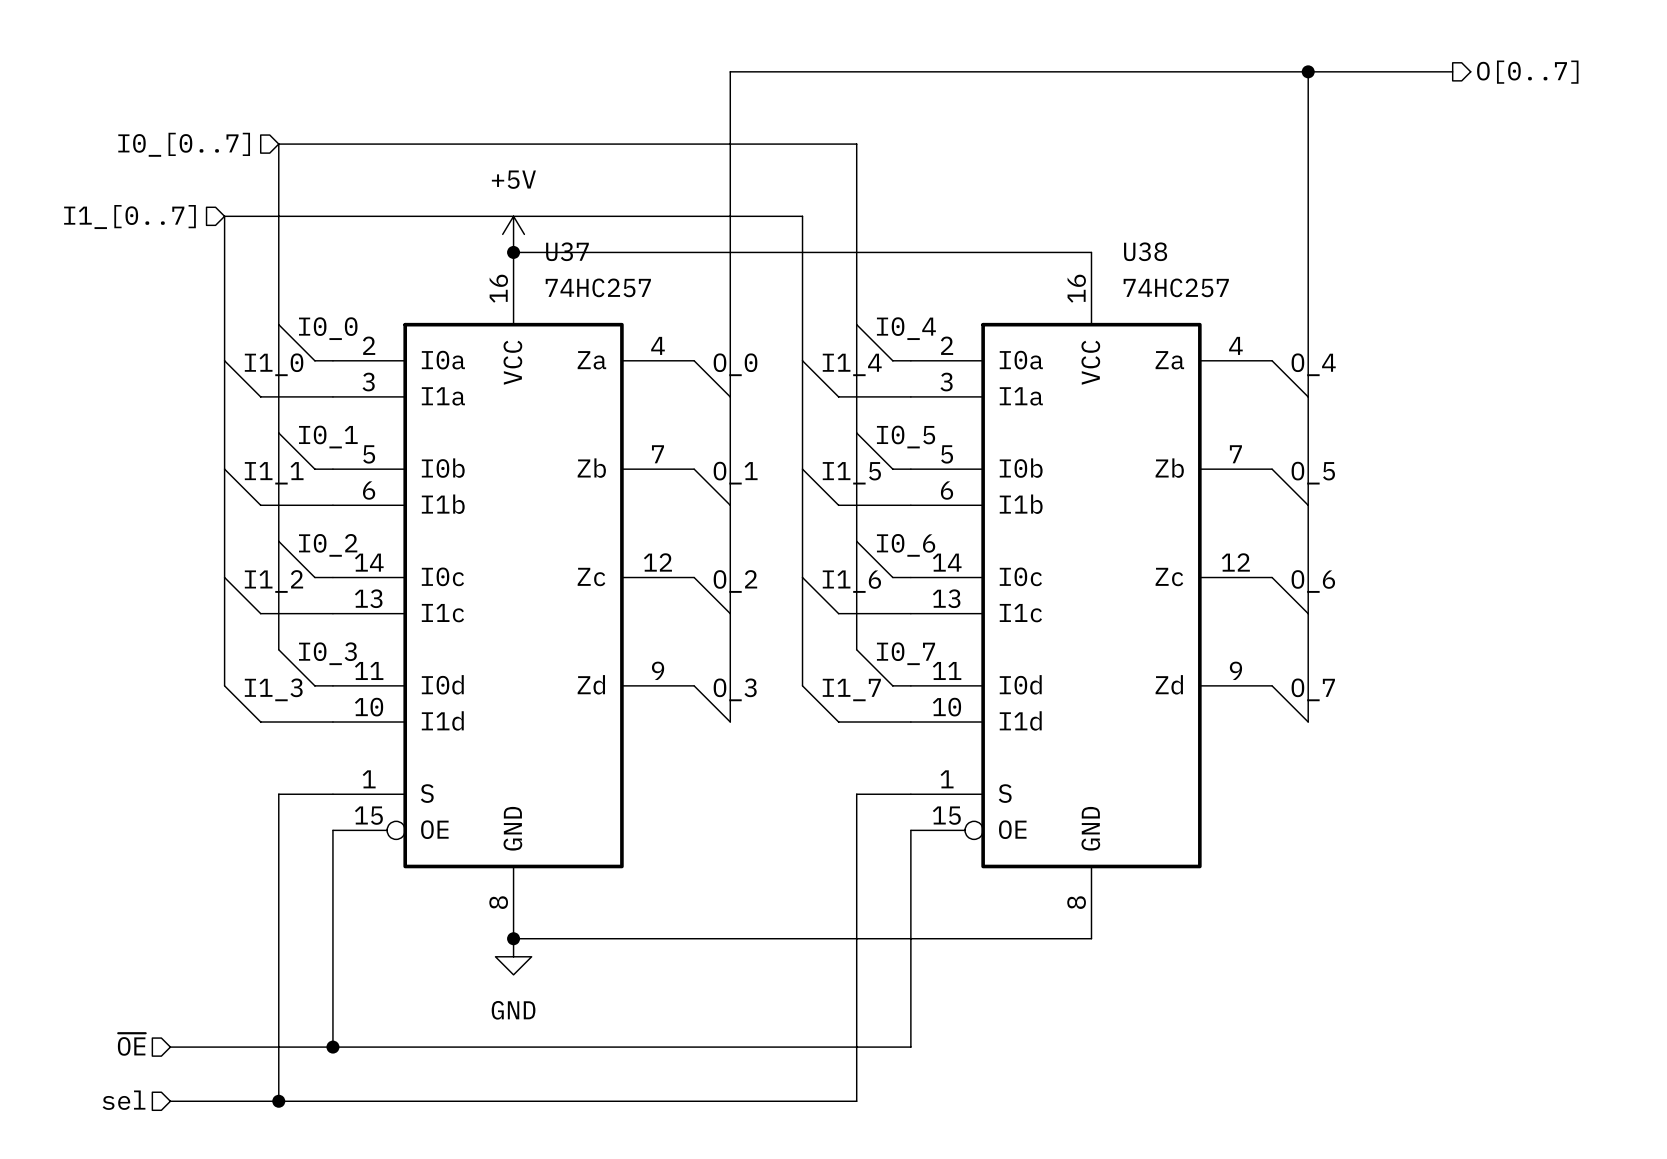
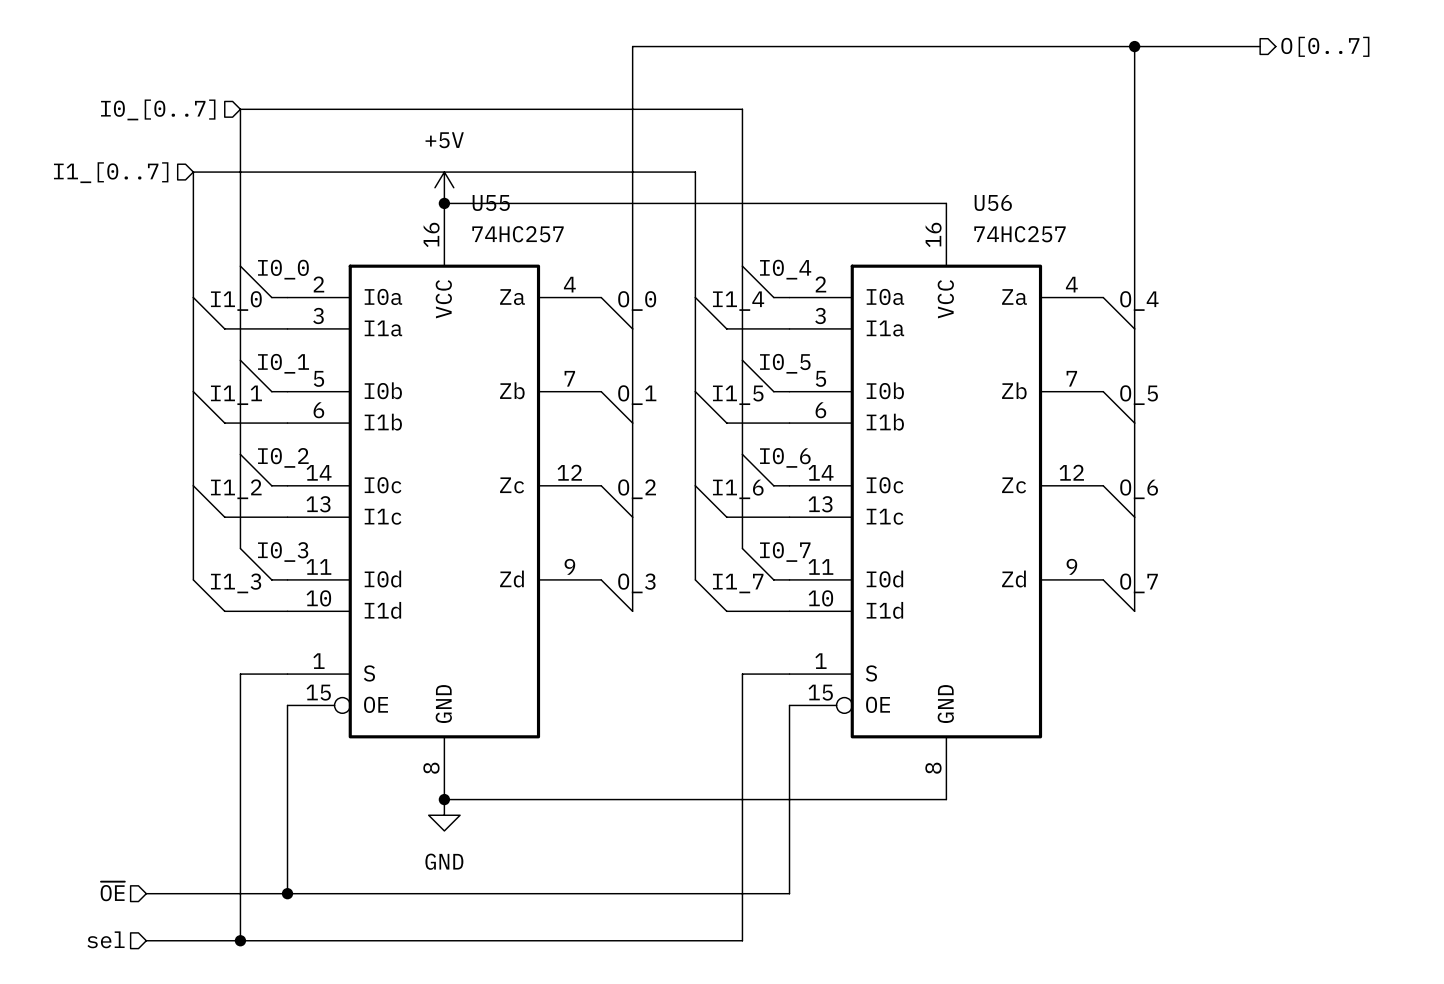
U37 name: U37 (567, 251) -> U55 (491, 202)
U38 name: U38 (1145, 251) -> U56 (993, 202)

